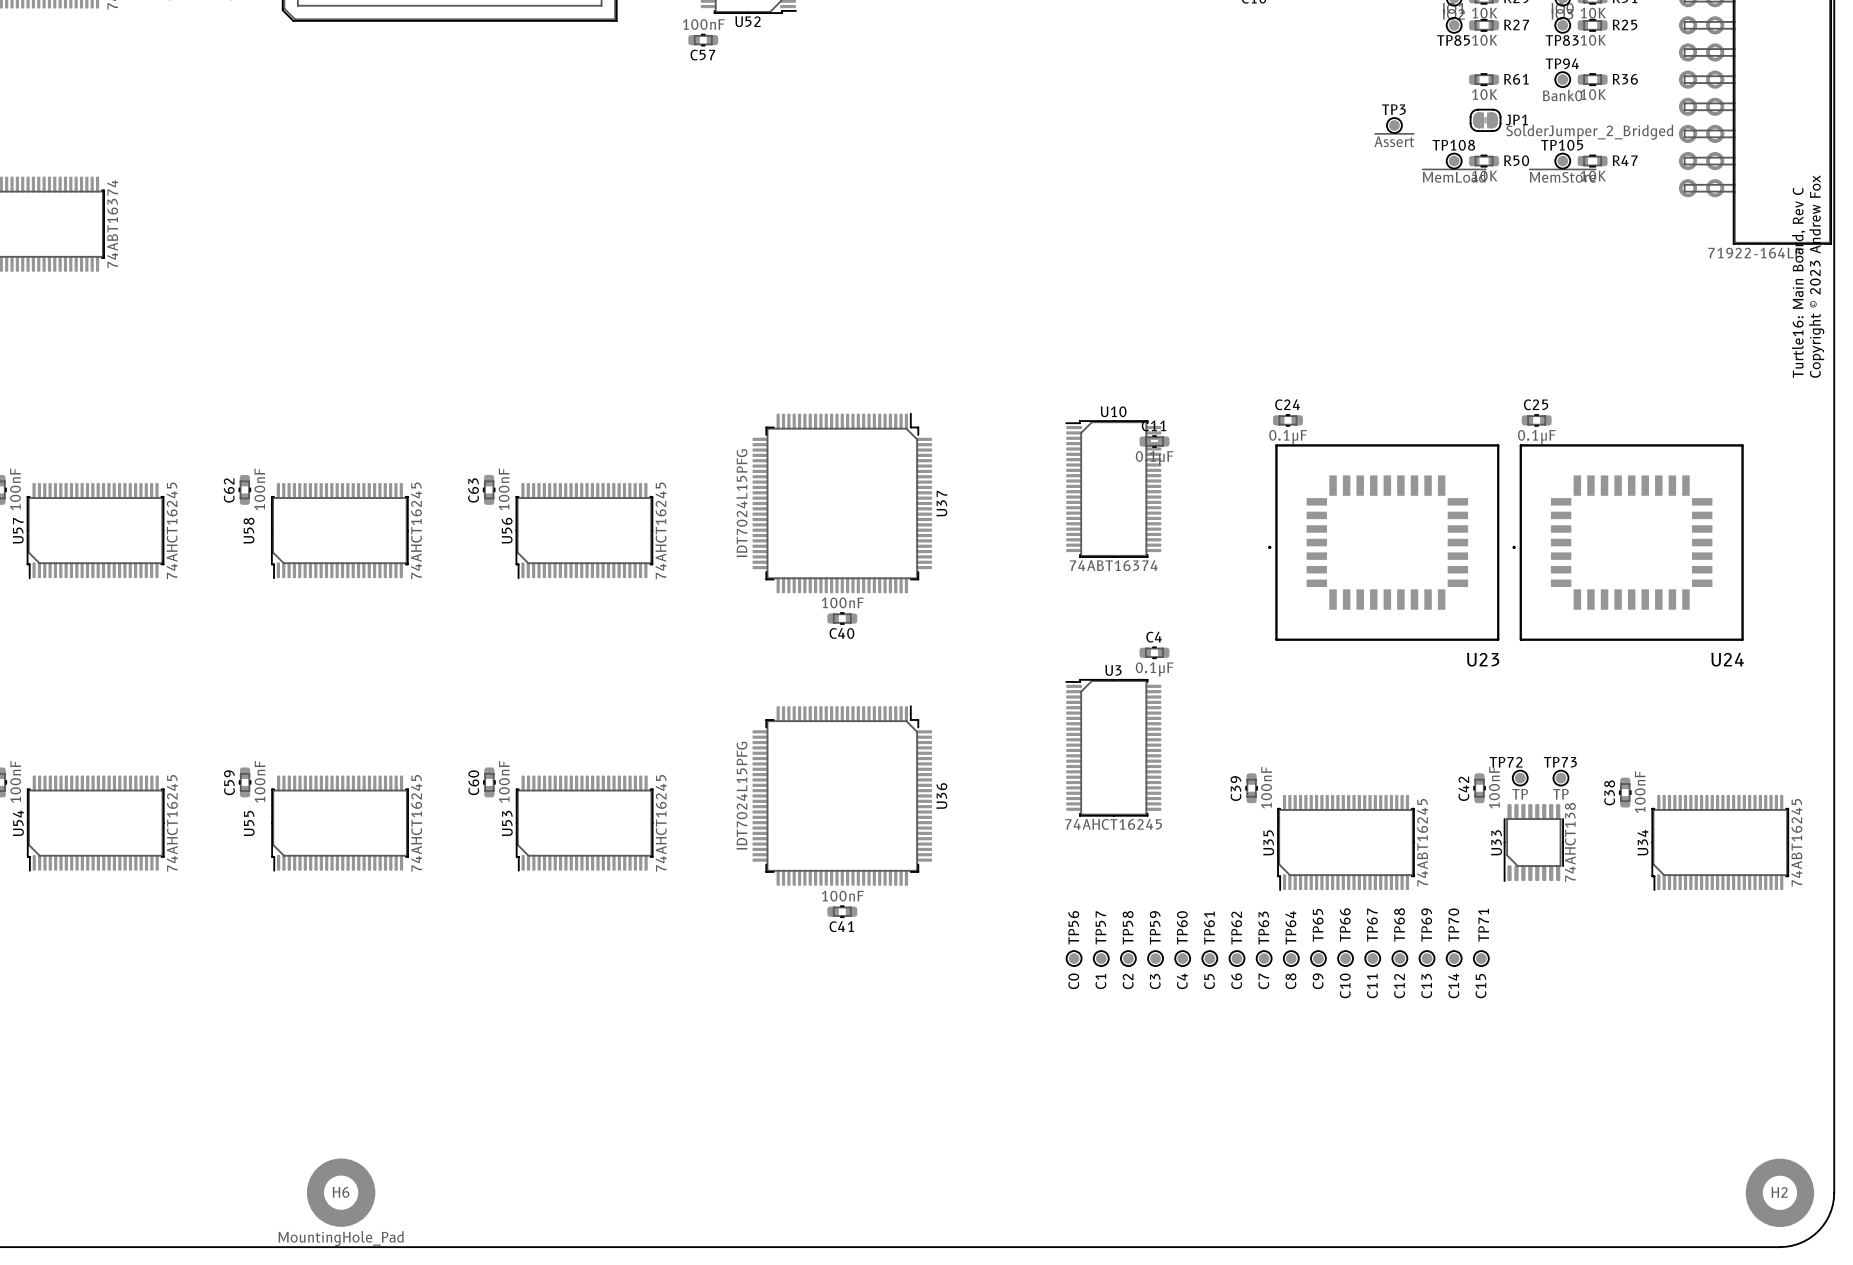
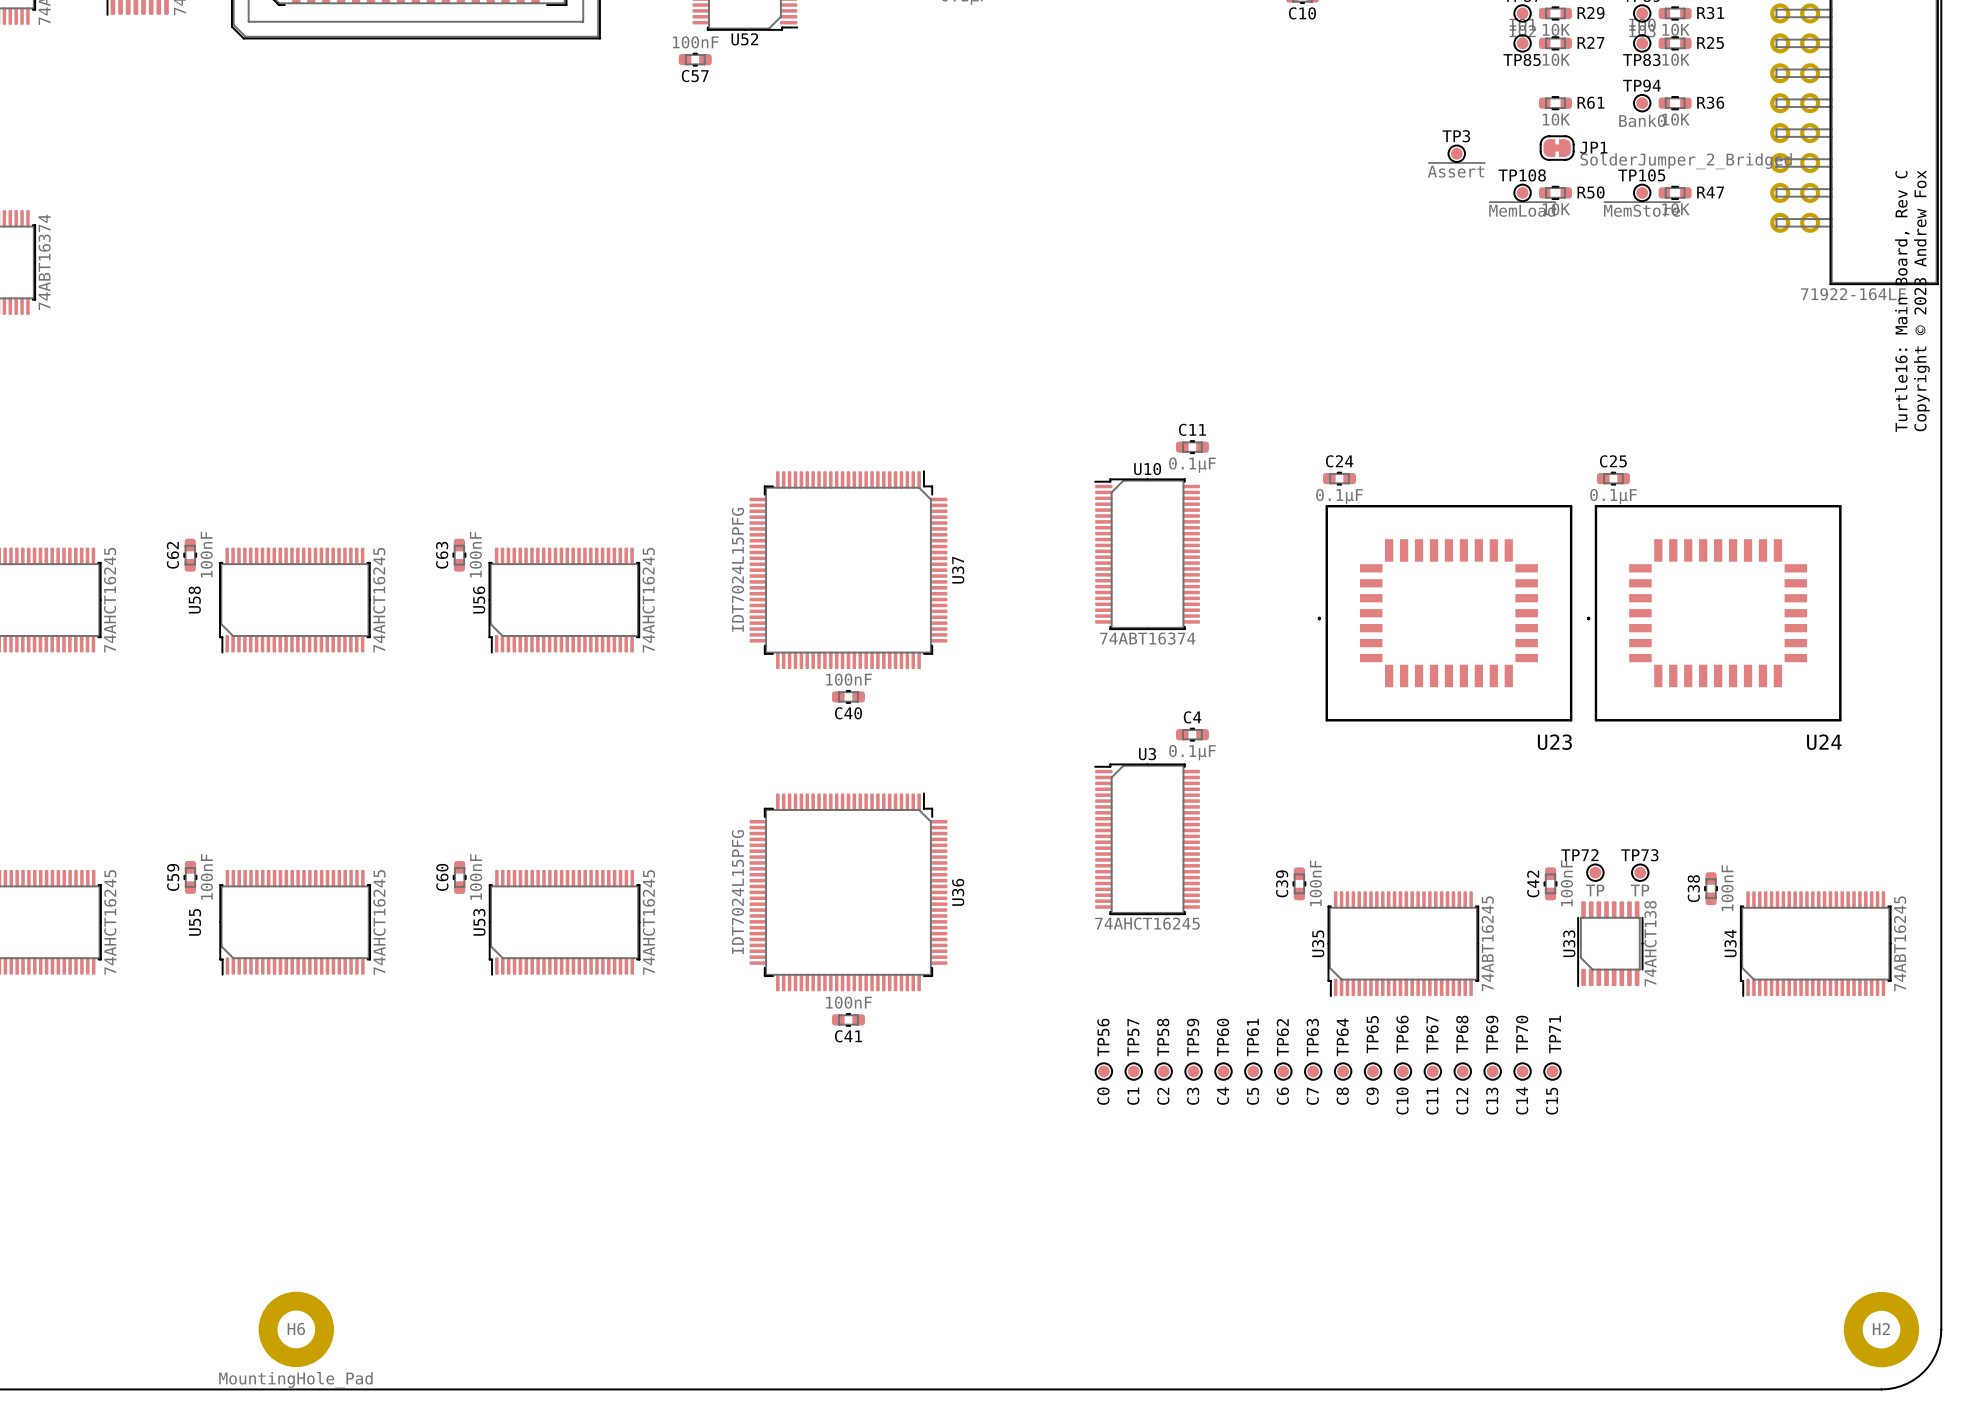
C11 position: (1154, 441) -> (1192, 447)

